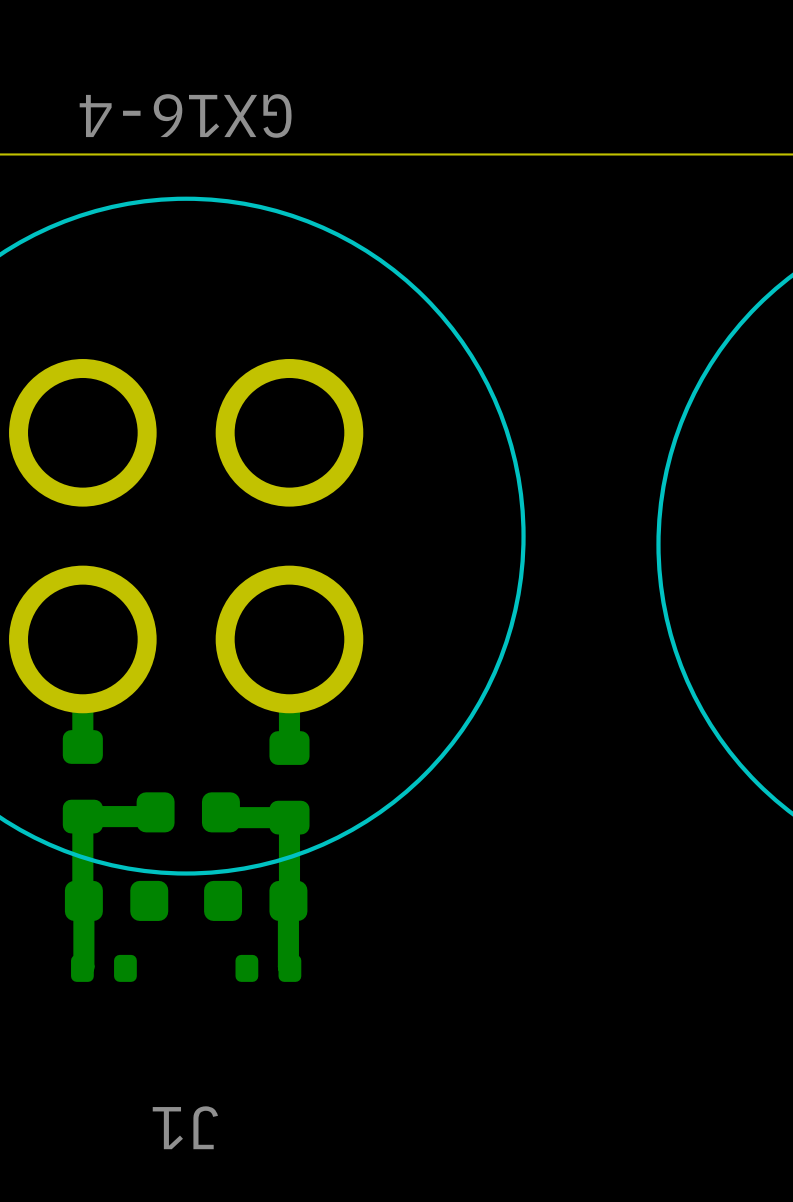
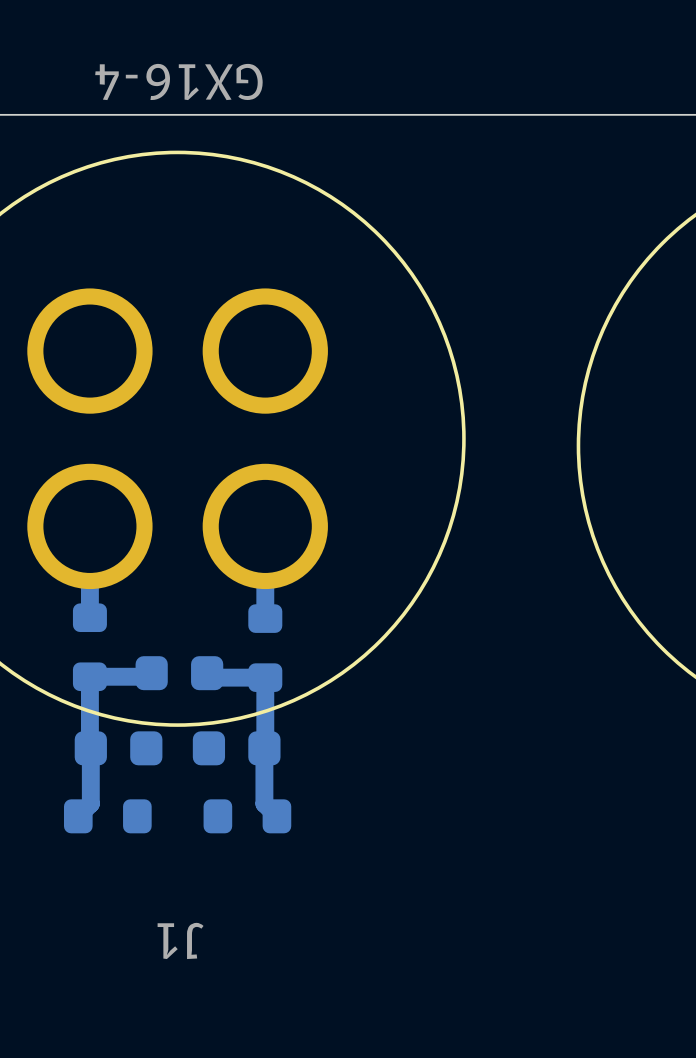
part footprint: [71, 954, 137, 982] -> [63, 799, 152, 834]
part footprint: [235, 954, 302, 982] -> [203, 799, 292, 834]

